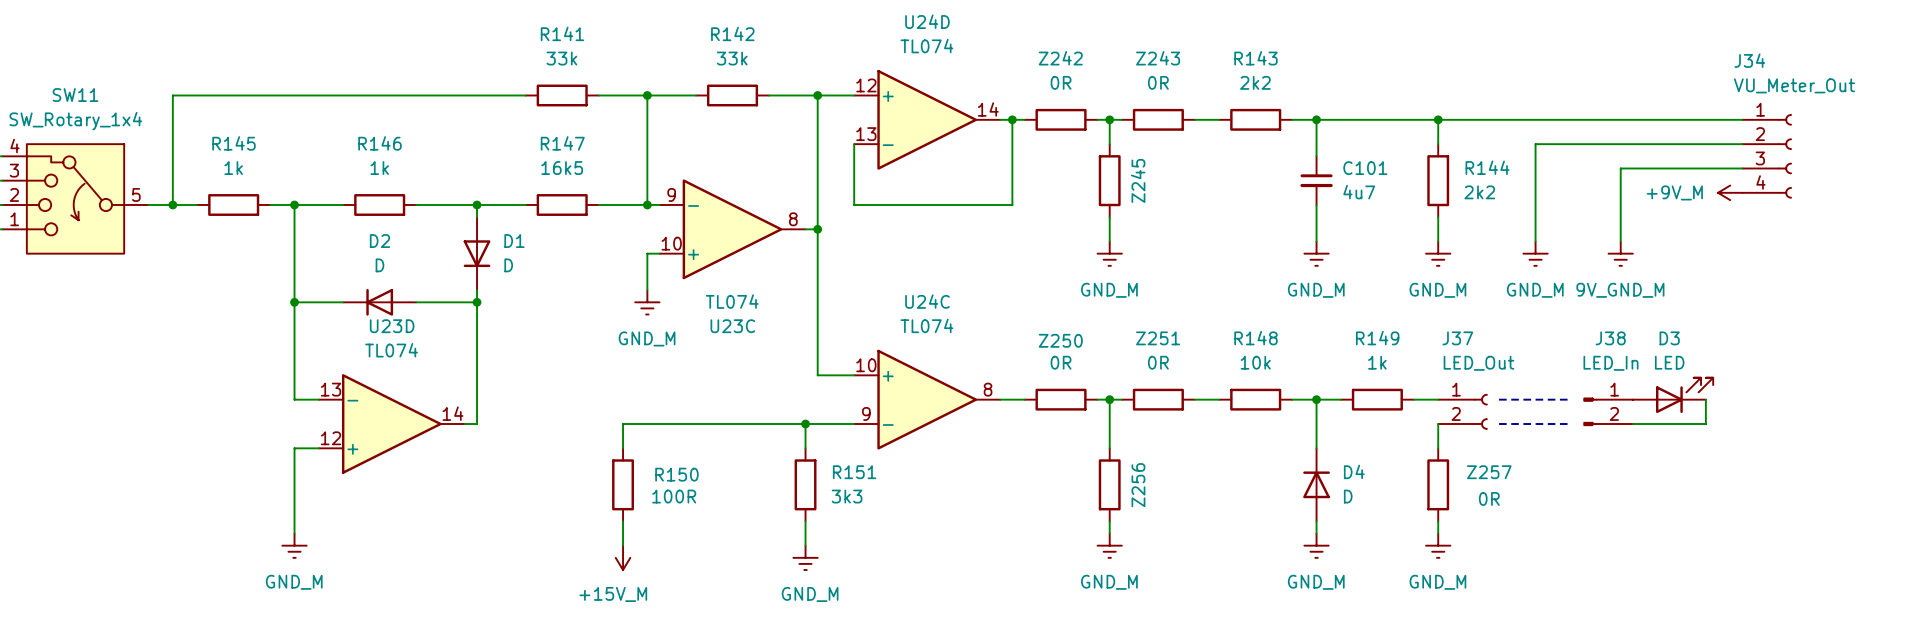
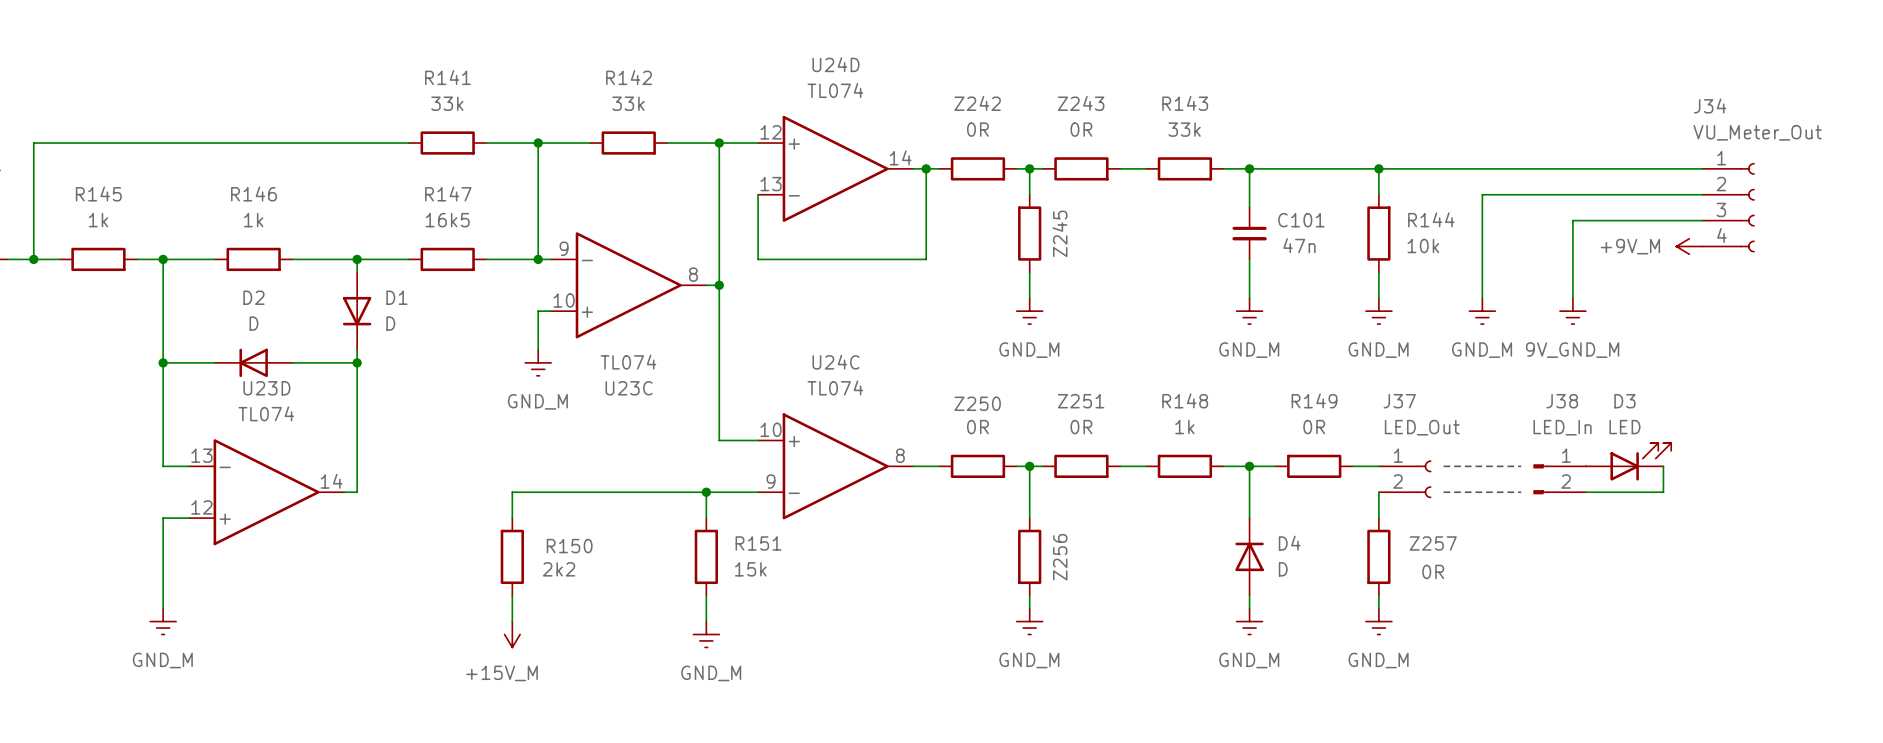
R143 value: 2k2 (1255, 82) -> 33k (1184, 129)
C101 value: 4u7 (1359, 192) -> 47n (1299, 245)
R144 value: 2k2 (1479, 192) -> 10k (1423, 246)
R148 value: 10k (1255, 362) -> 1k (1184, 427)
R149 value: 1k (1377, 362) -> 0R (1314, 427)
R150 value: 100R (674, 496) -> 2k2 (559, 569)
R151 value: 3k3 (847, 496) -> 15k (750, 569)

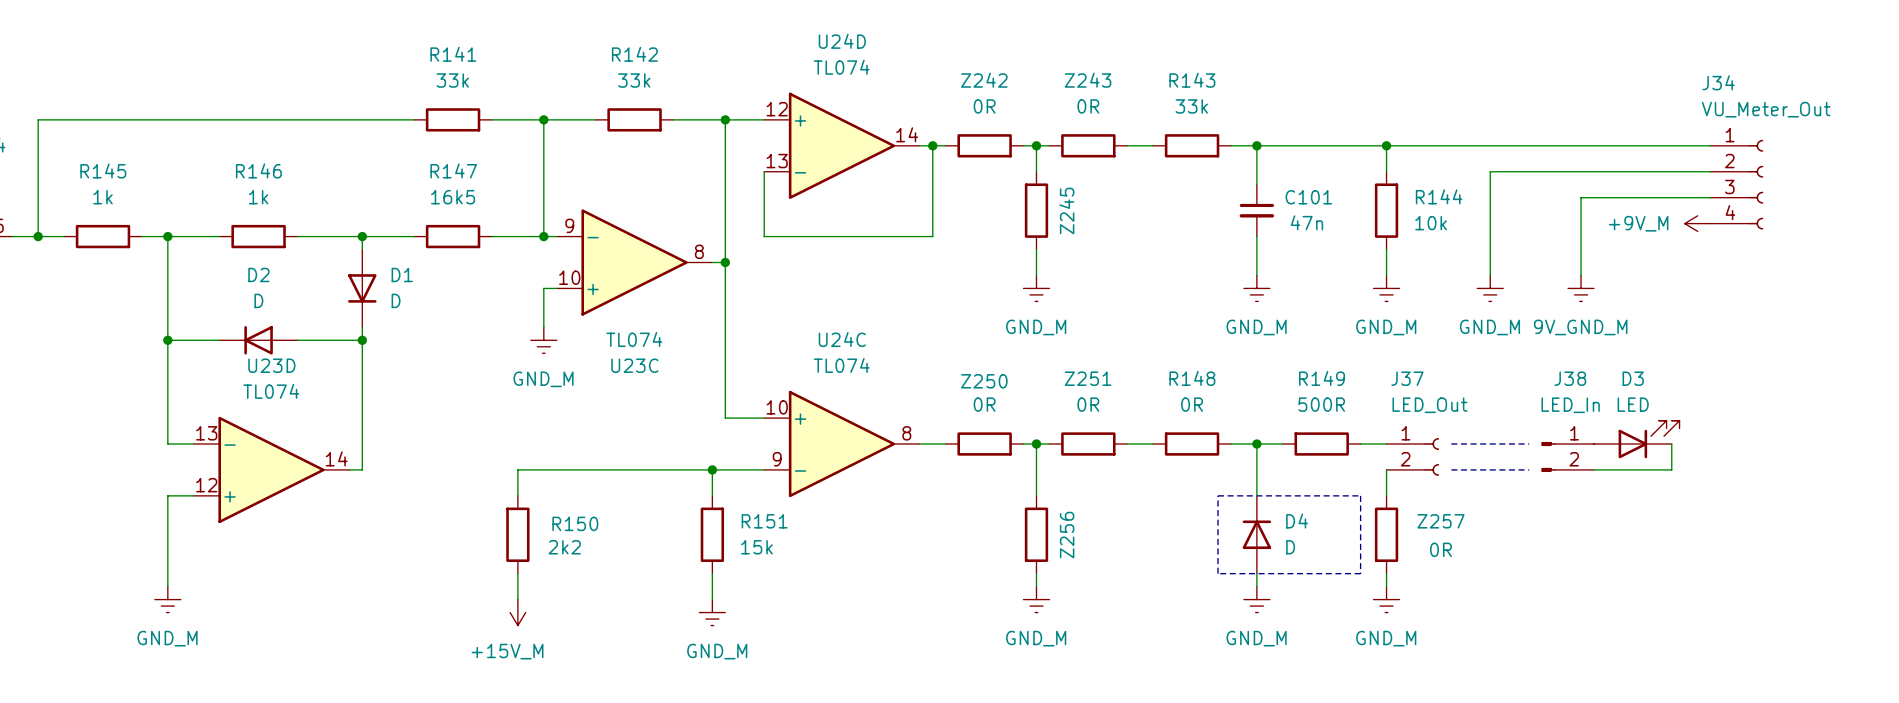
R148 value: 1k (1184, 427) -> 0R (1192, 404)
R149 value: 0R (1314, 427) -> 500R (1321, 404)
line: none -> (1217, 495) (1360, 495) (1360, 573) (1217, 573) (1217, 495)

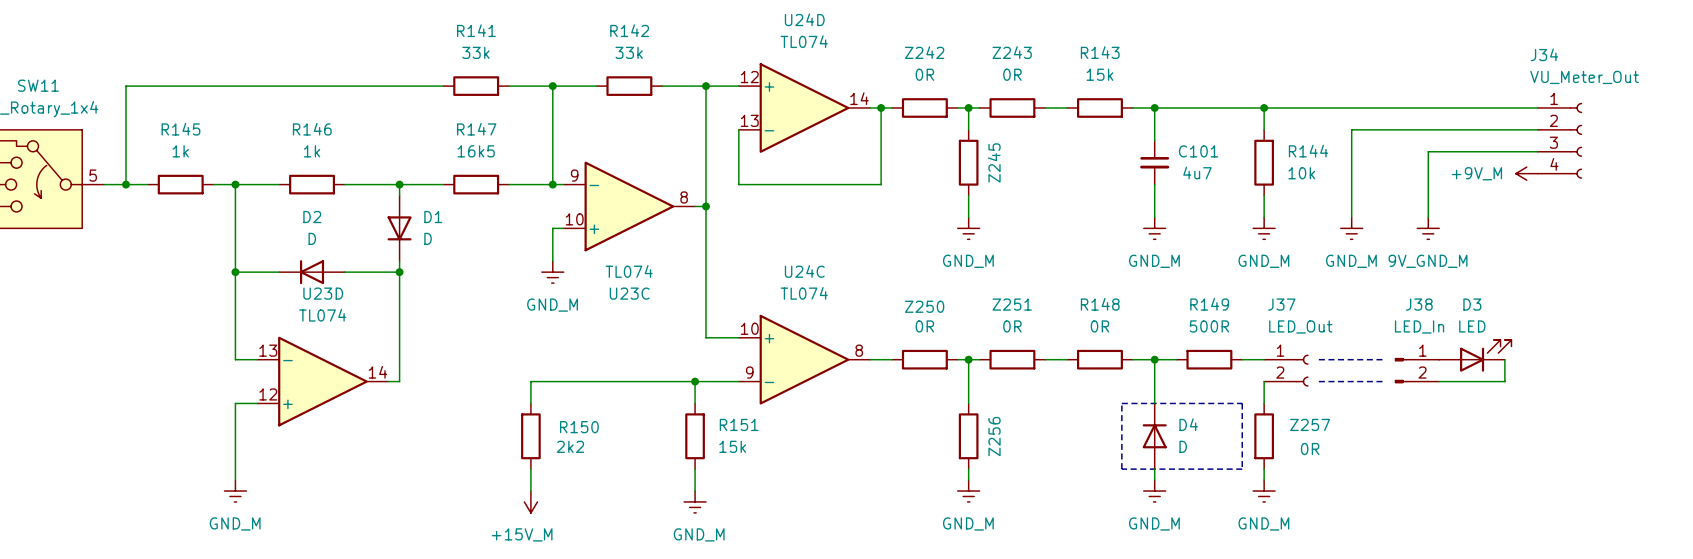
R143 value: 33k (1191, 106) -> 15k (1099, 74)
C101 value: 47n (1306, 222) -> 4u7 (1197, 172)

